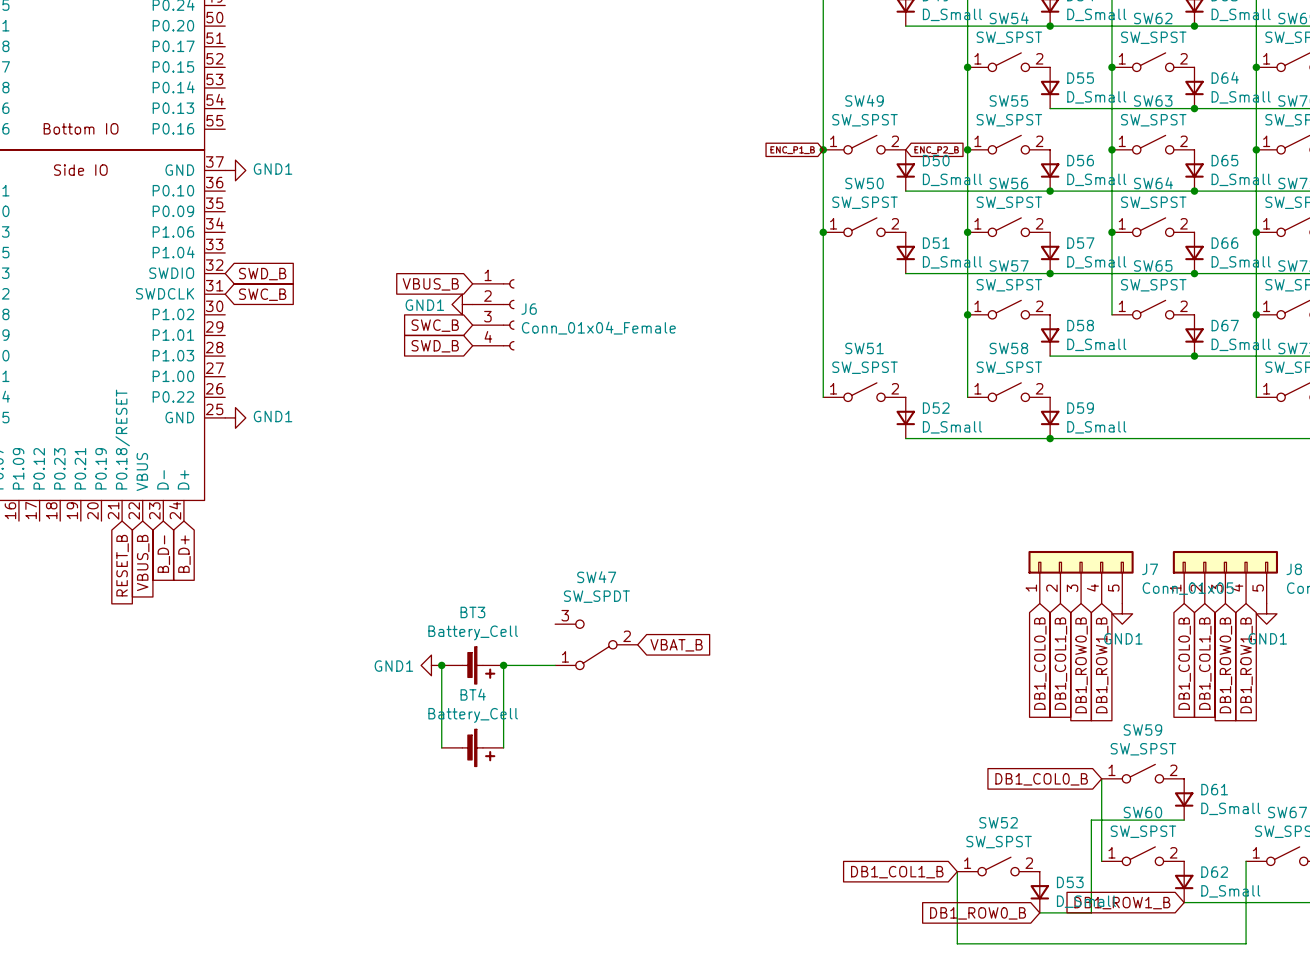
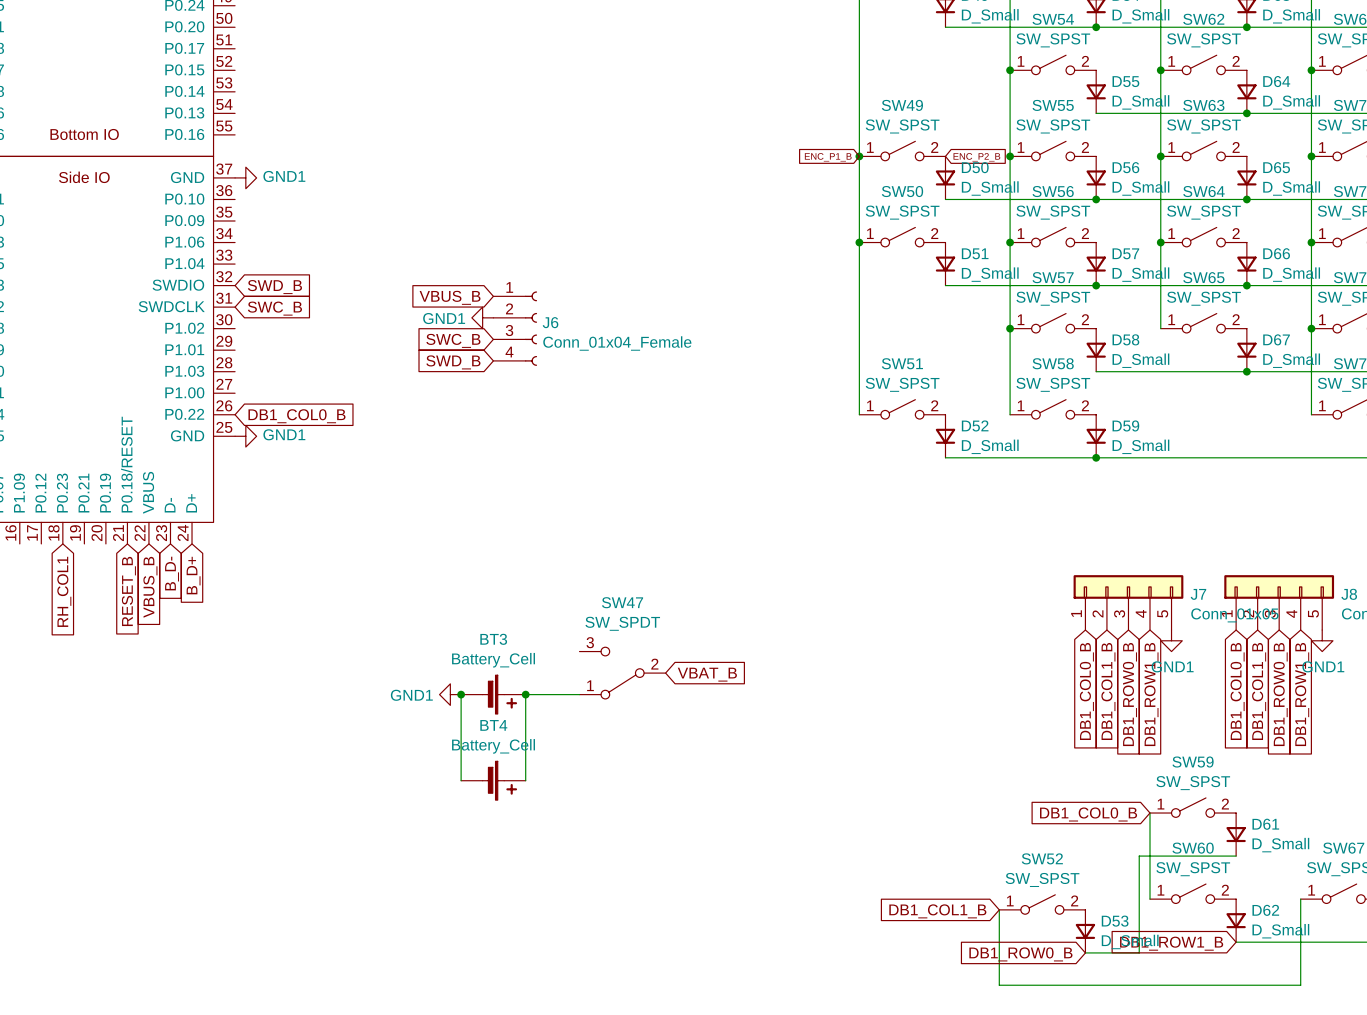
global label: none -> DB1_COL0_B (296, 416)
global label: none -> RH_COL1 (64, 591)

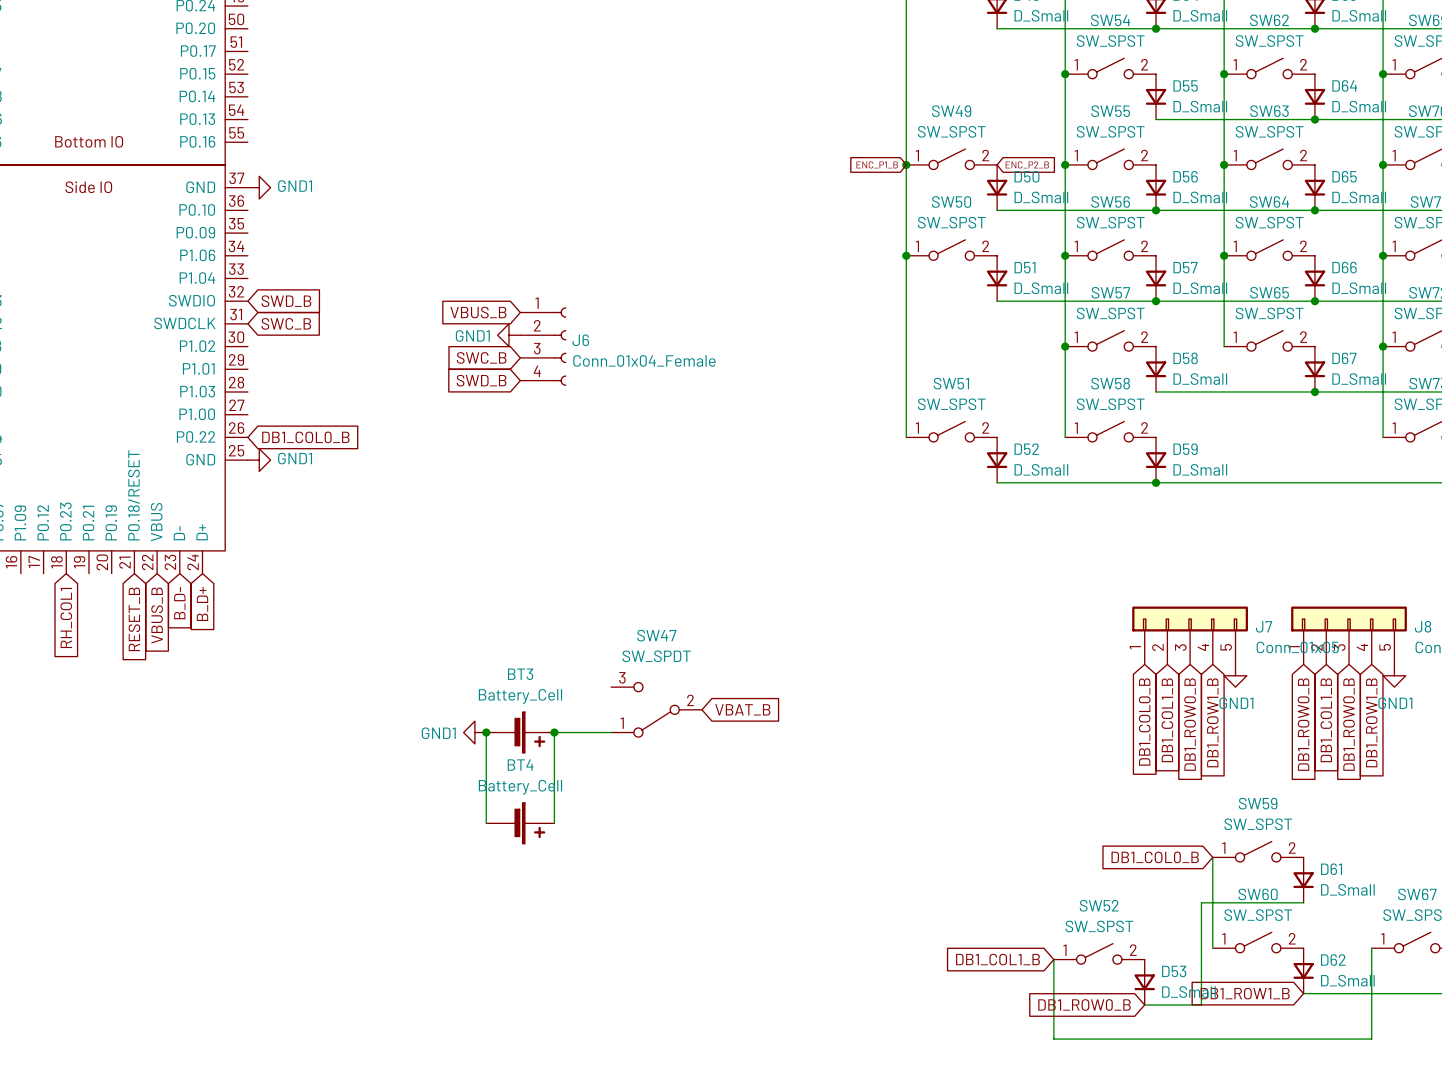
global label: DB1_COL0_B (1237, 691) -> DB1_ROW0_B (1303, 724)

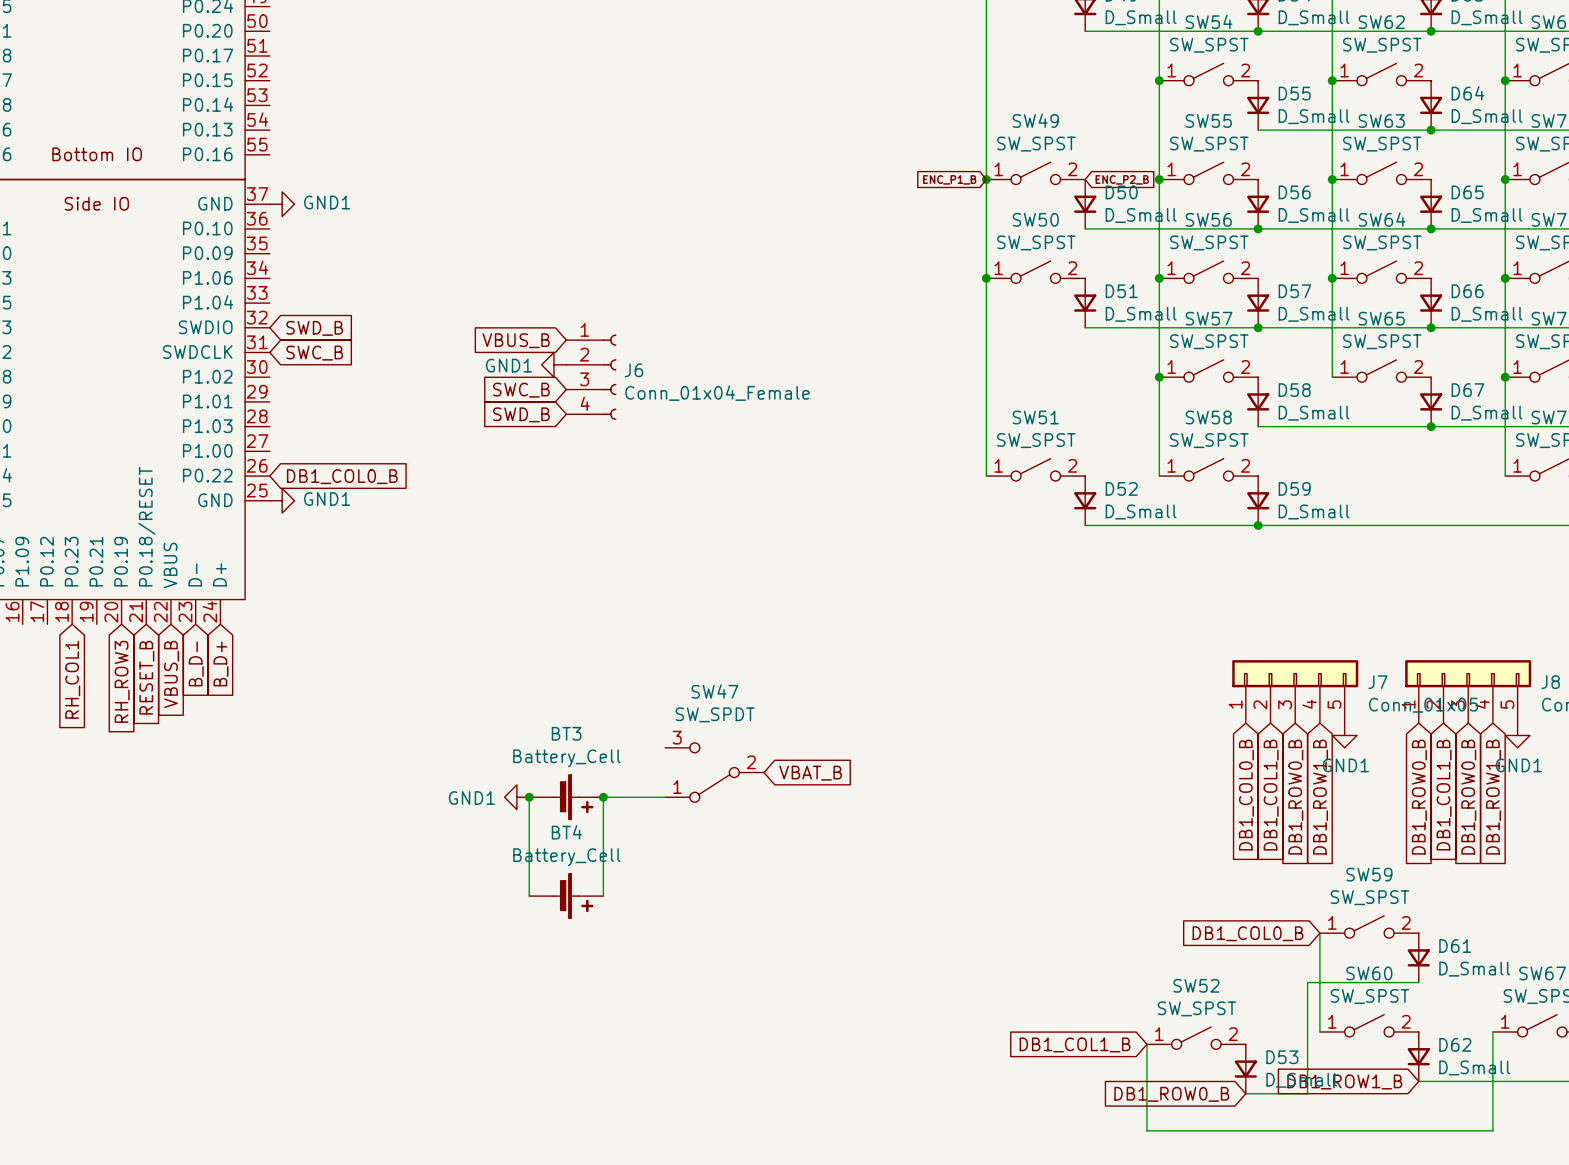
global label: none -> RH_ROW3 (122, 681)

